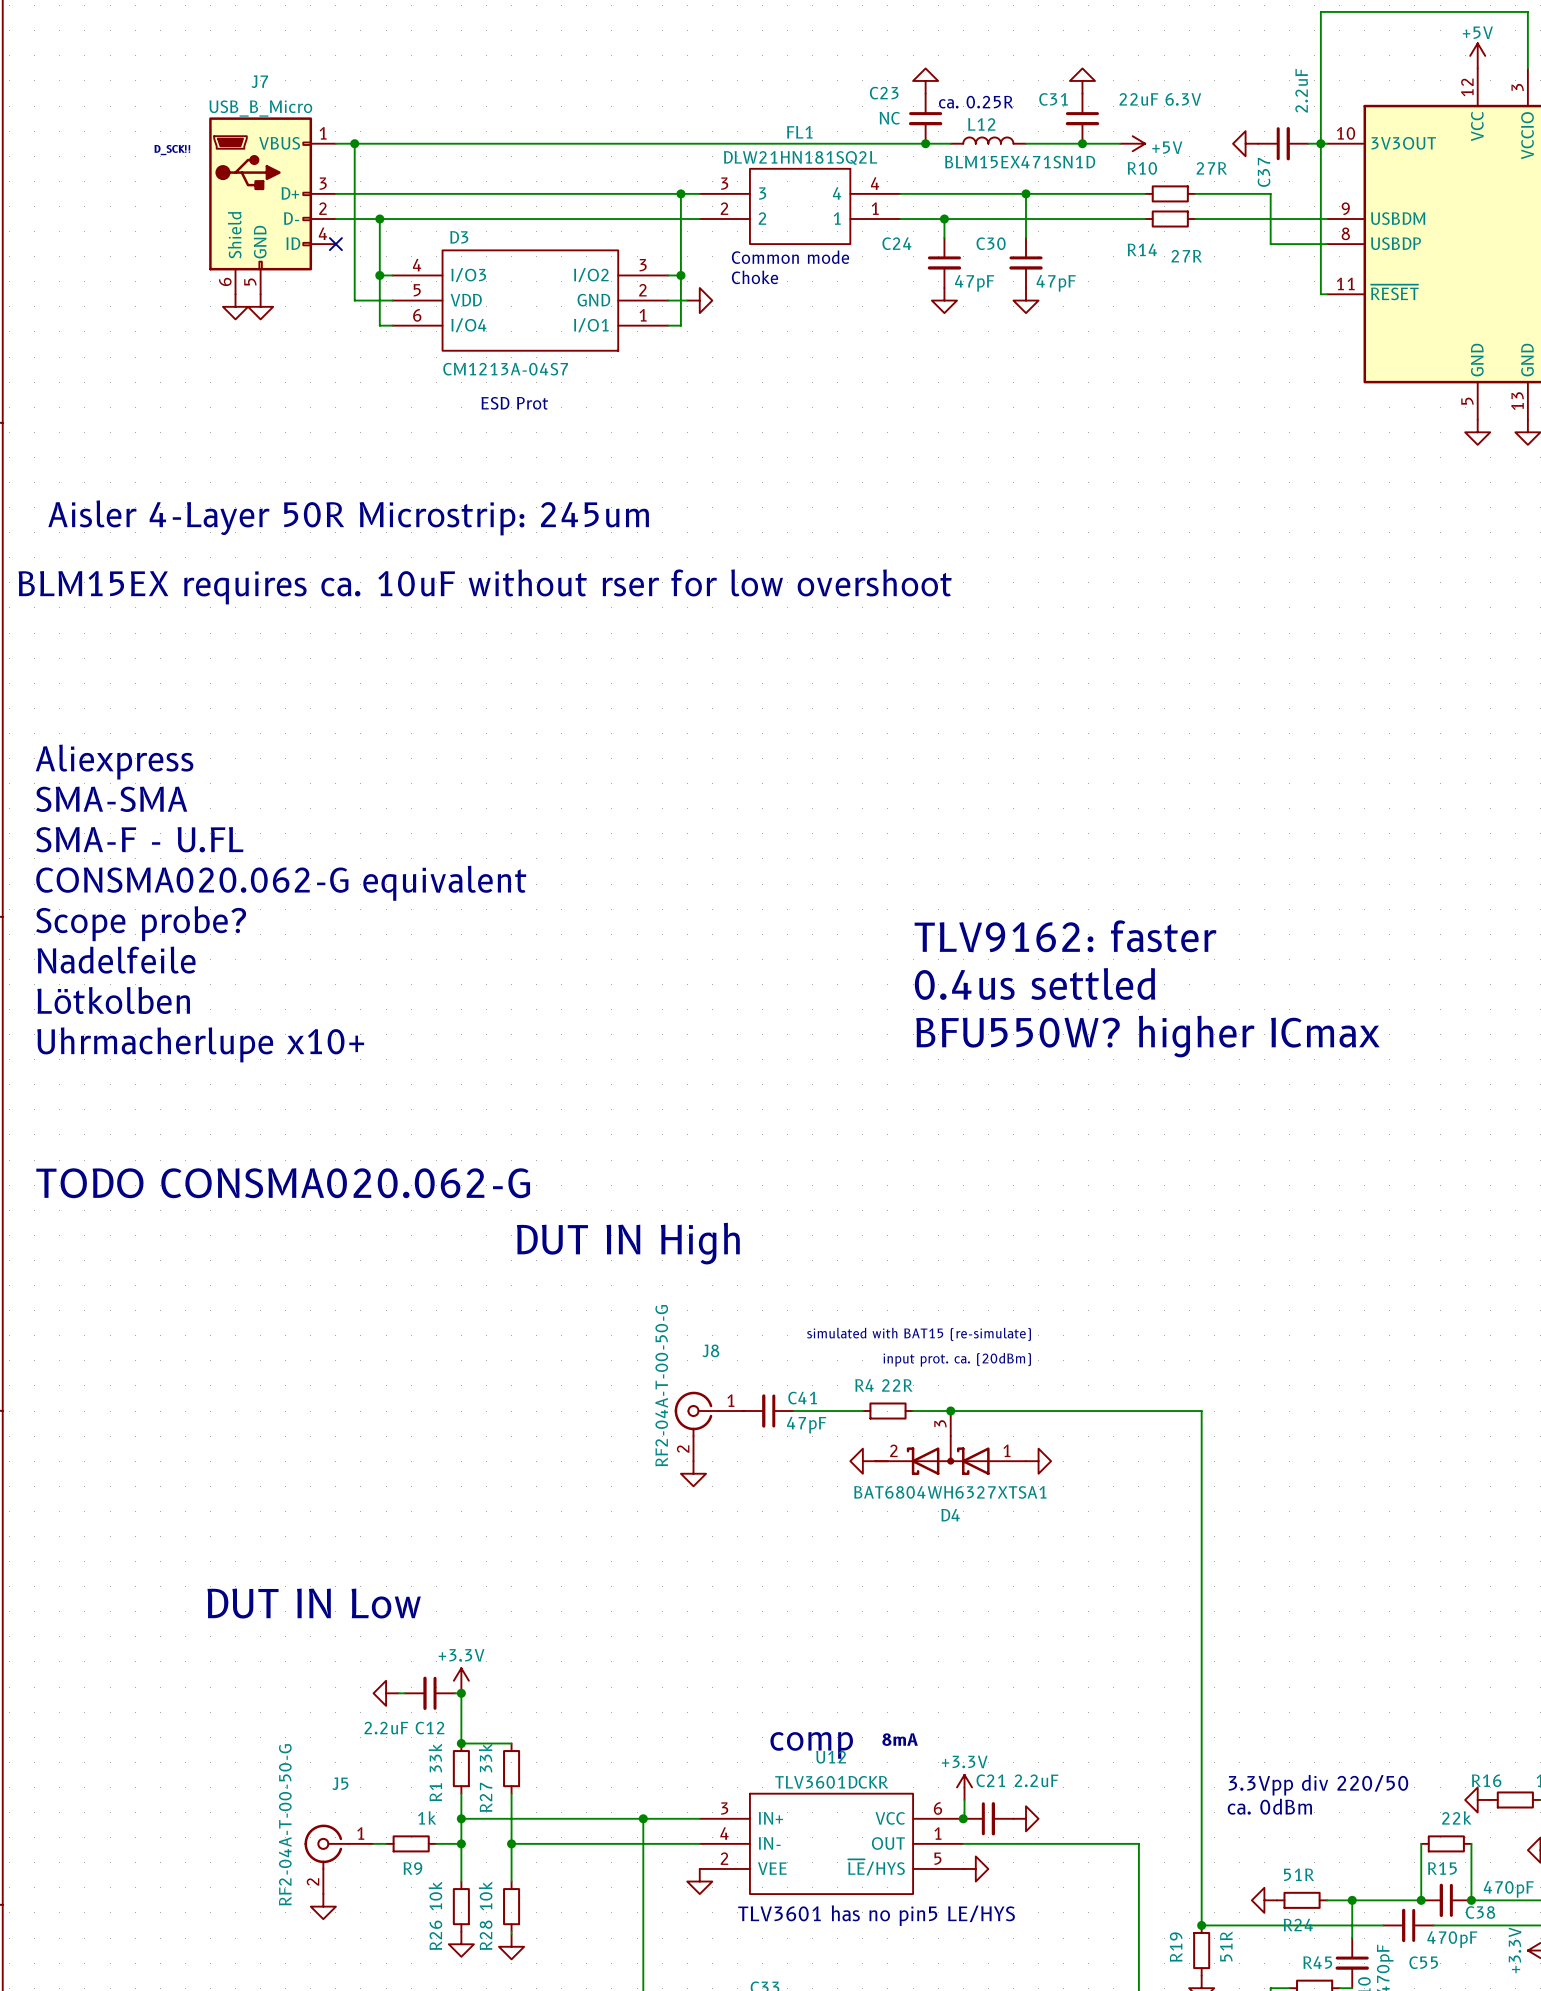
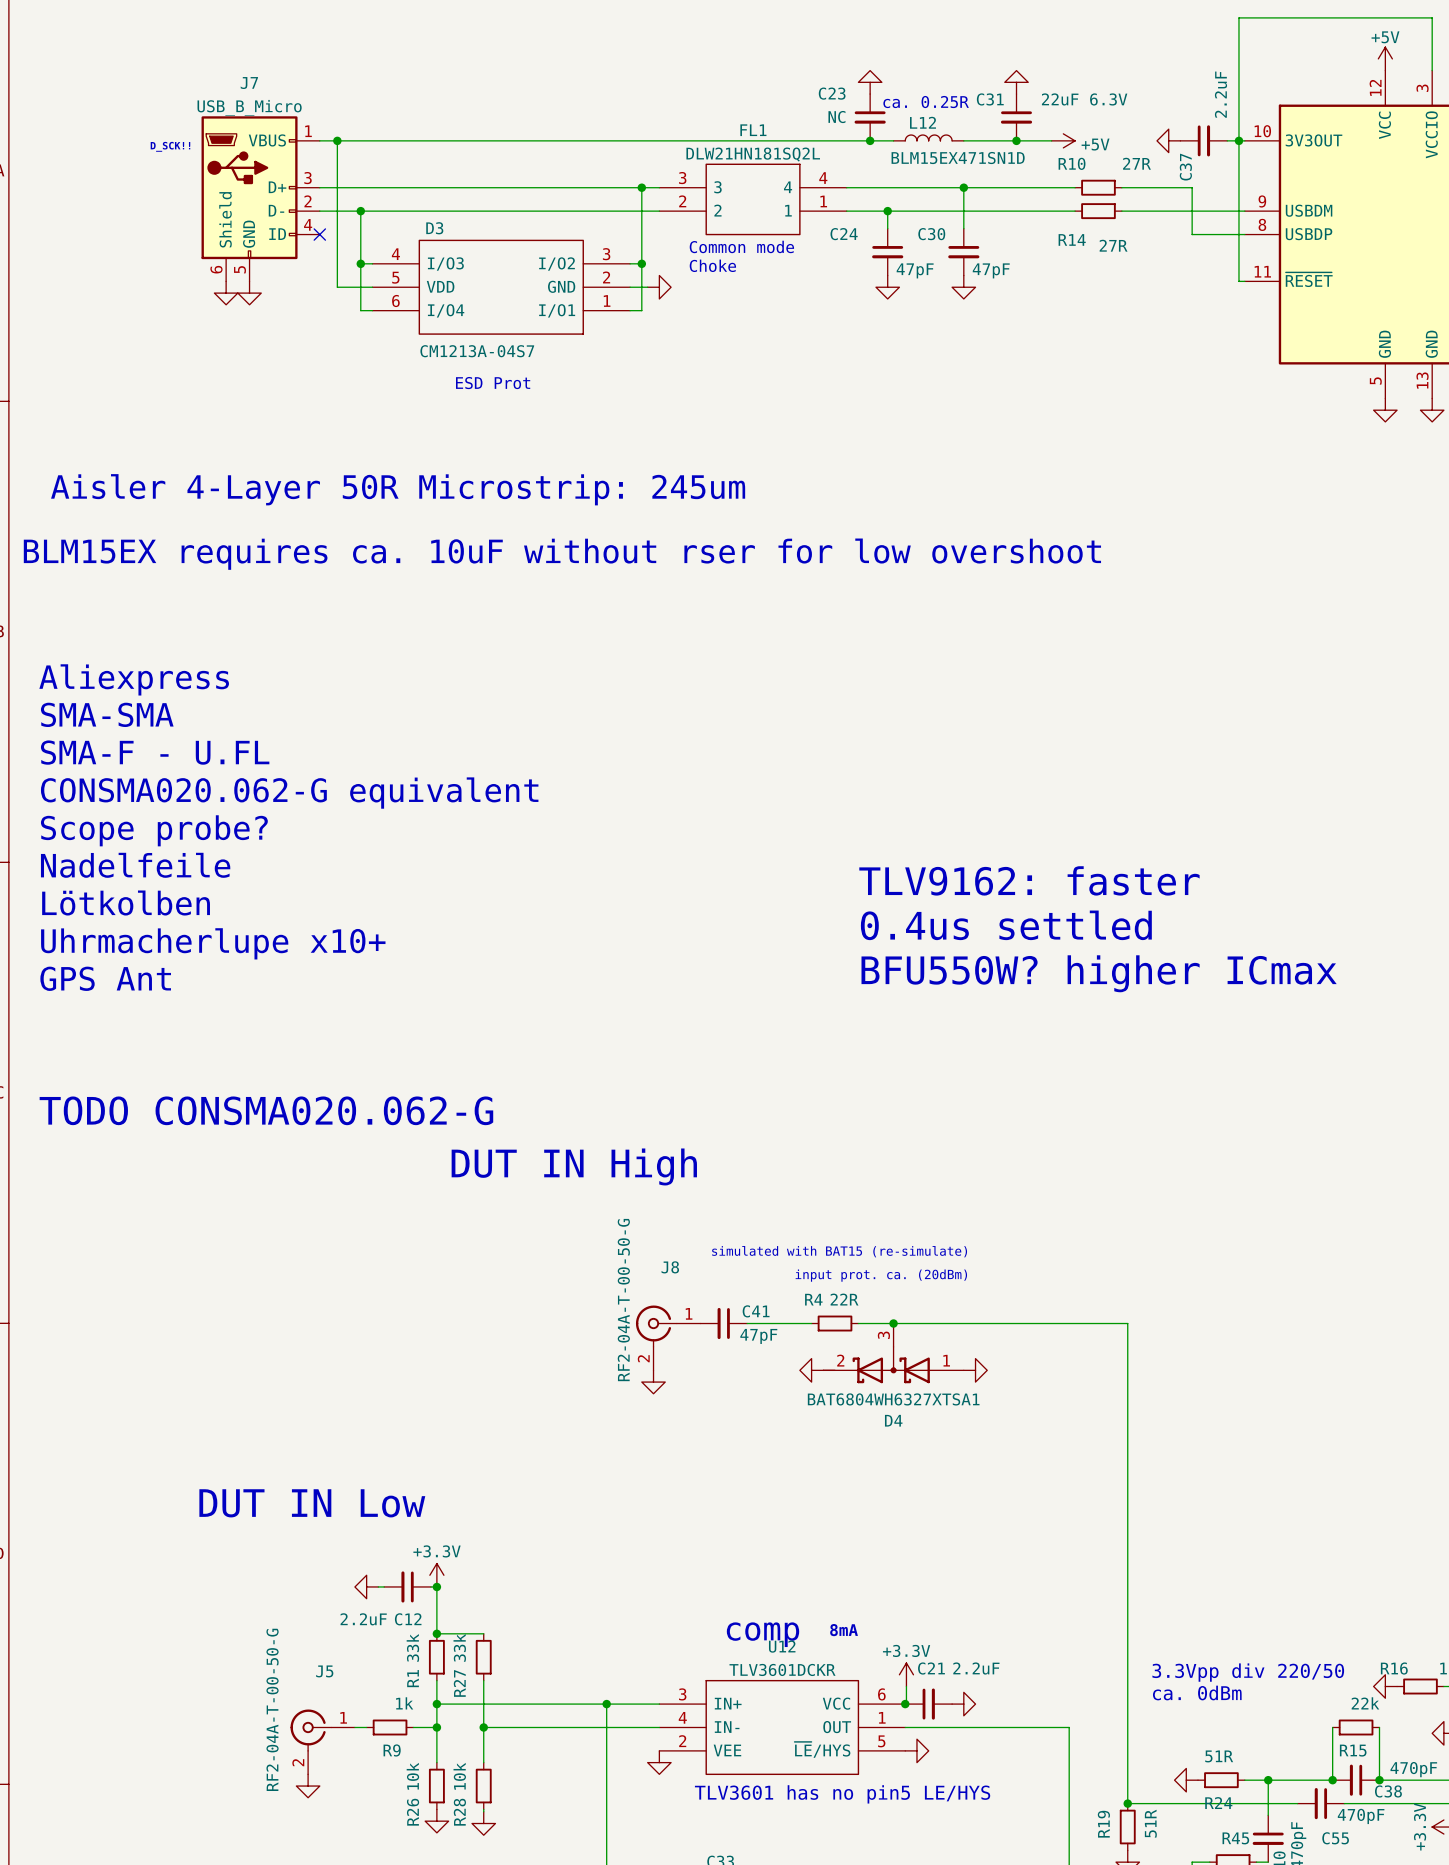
text: none -> Aliexpress (134, 679)
text: Aliexpress (114, 762) -> SMA-SMA (107, 714)
text: SMA-SMA (111, 799) -> SMA-F - U.FL (155, 752)
text: SMA-F - U.FL (139, 839) -> CONSMA020.062-G equivalent (289, 793)
text: CONSMA020.062-G equivalent (281, 883) -> Scope probe? (154, 830)
text: Scope probe? (141, 923) -> Nadelfeile (135, 865)
text: Nadelfeile (116, 960) -> Lötkolben (126, 903)
text: Lötkolben (113, 1000) -> Uhrmacherlupe x10+ (213, 943)
text: Uhrmacherlupe x10+ (200, 1044) -> GPS Ant (105, 978)

